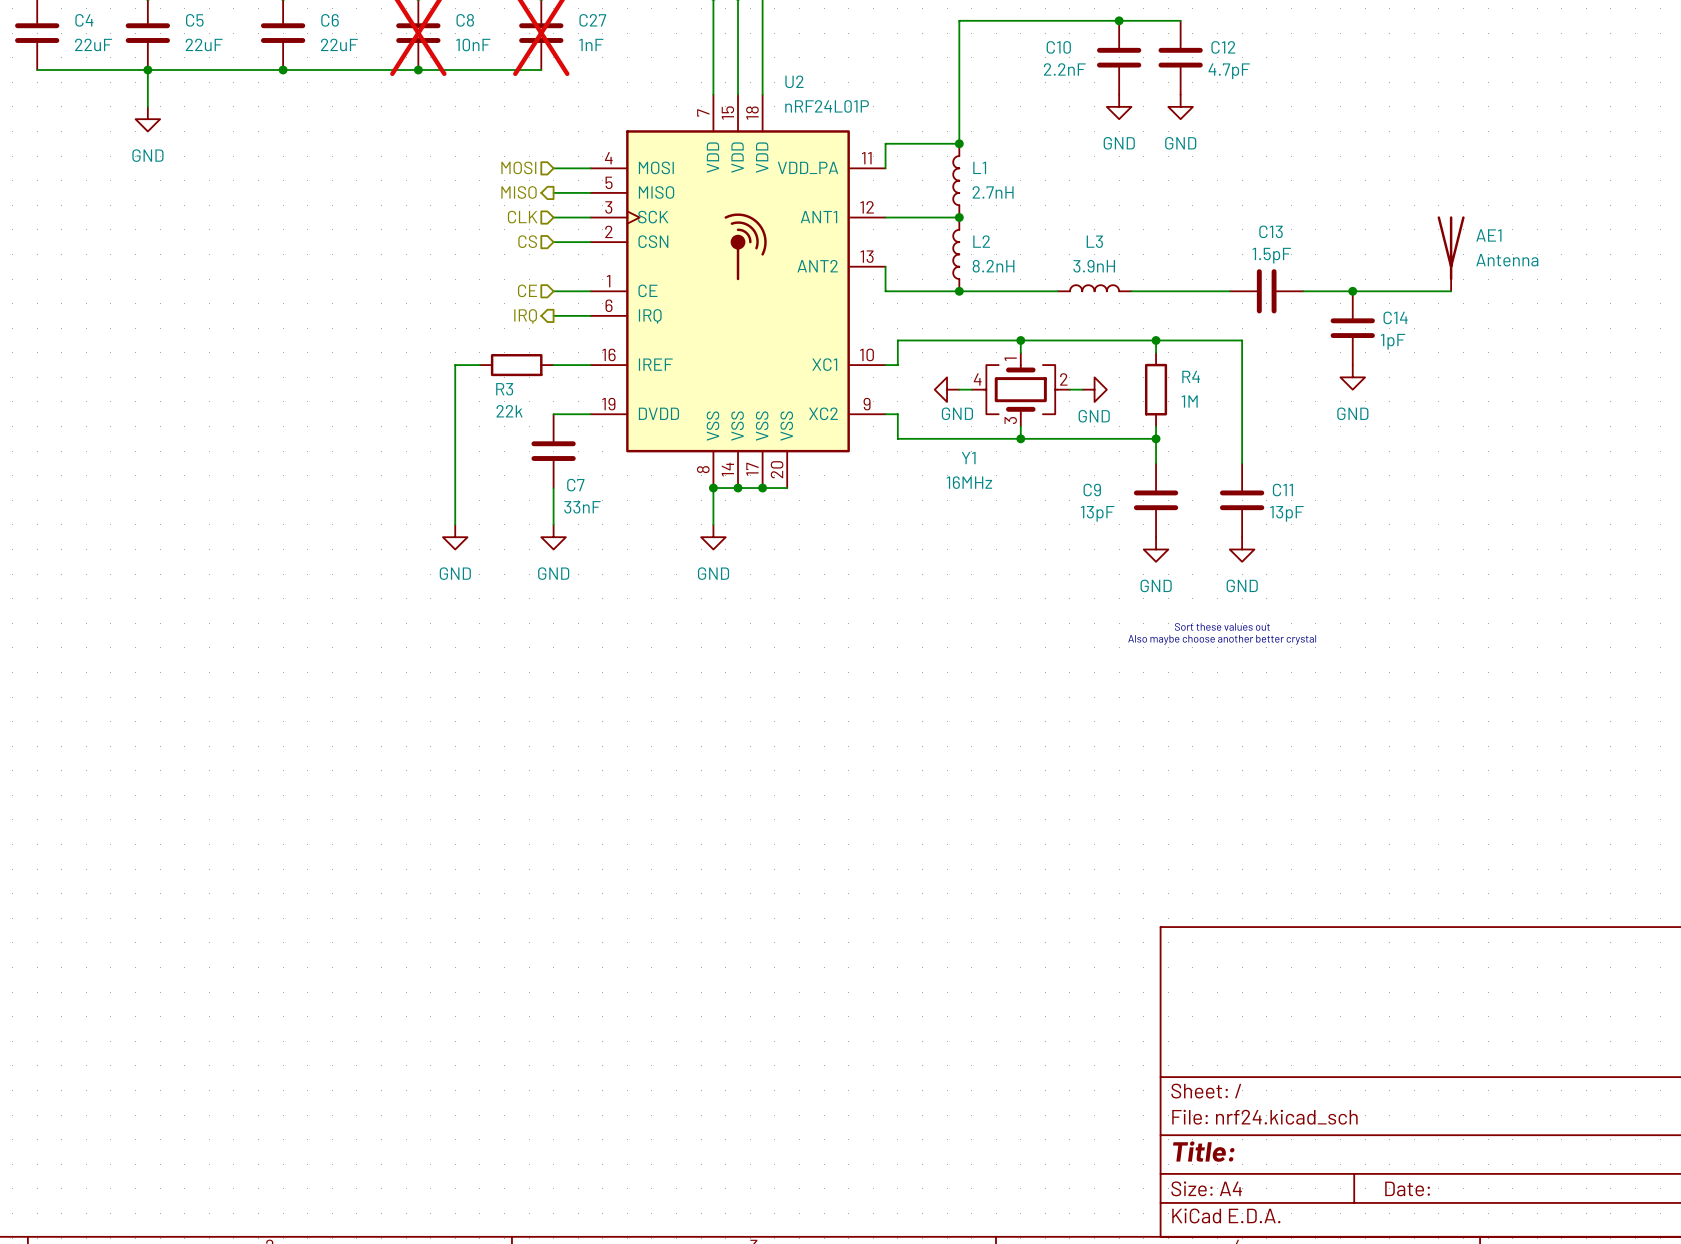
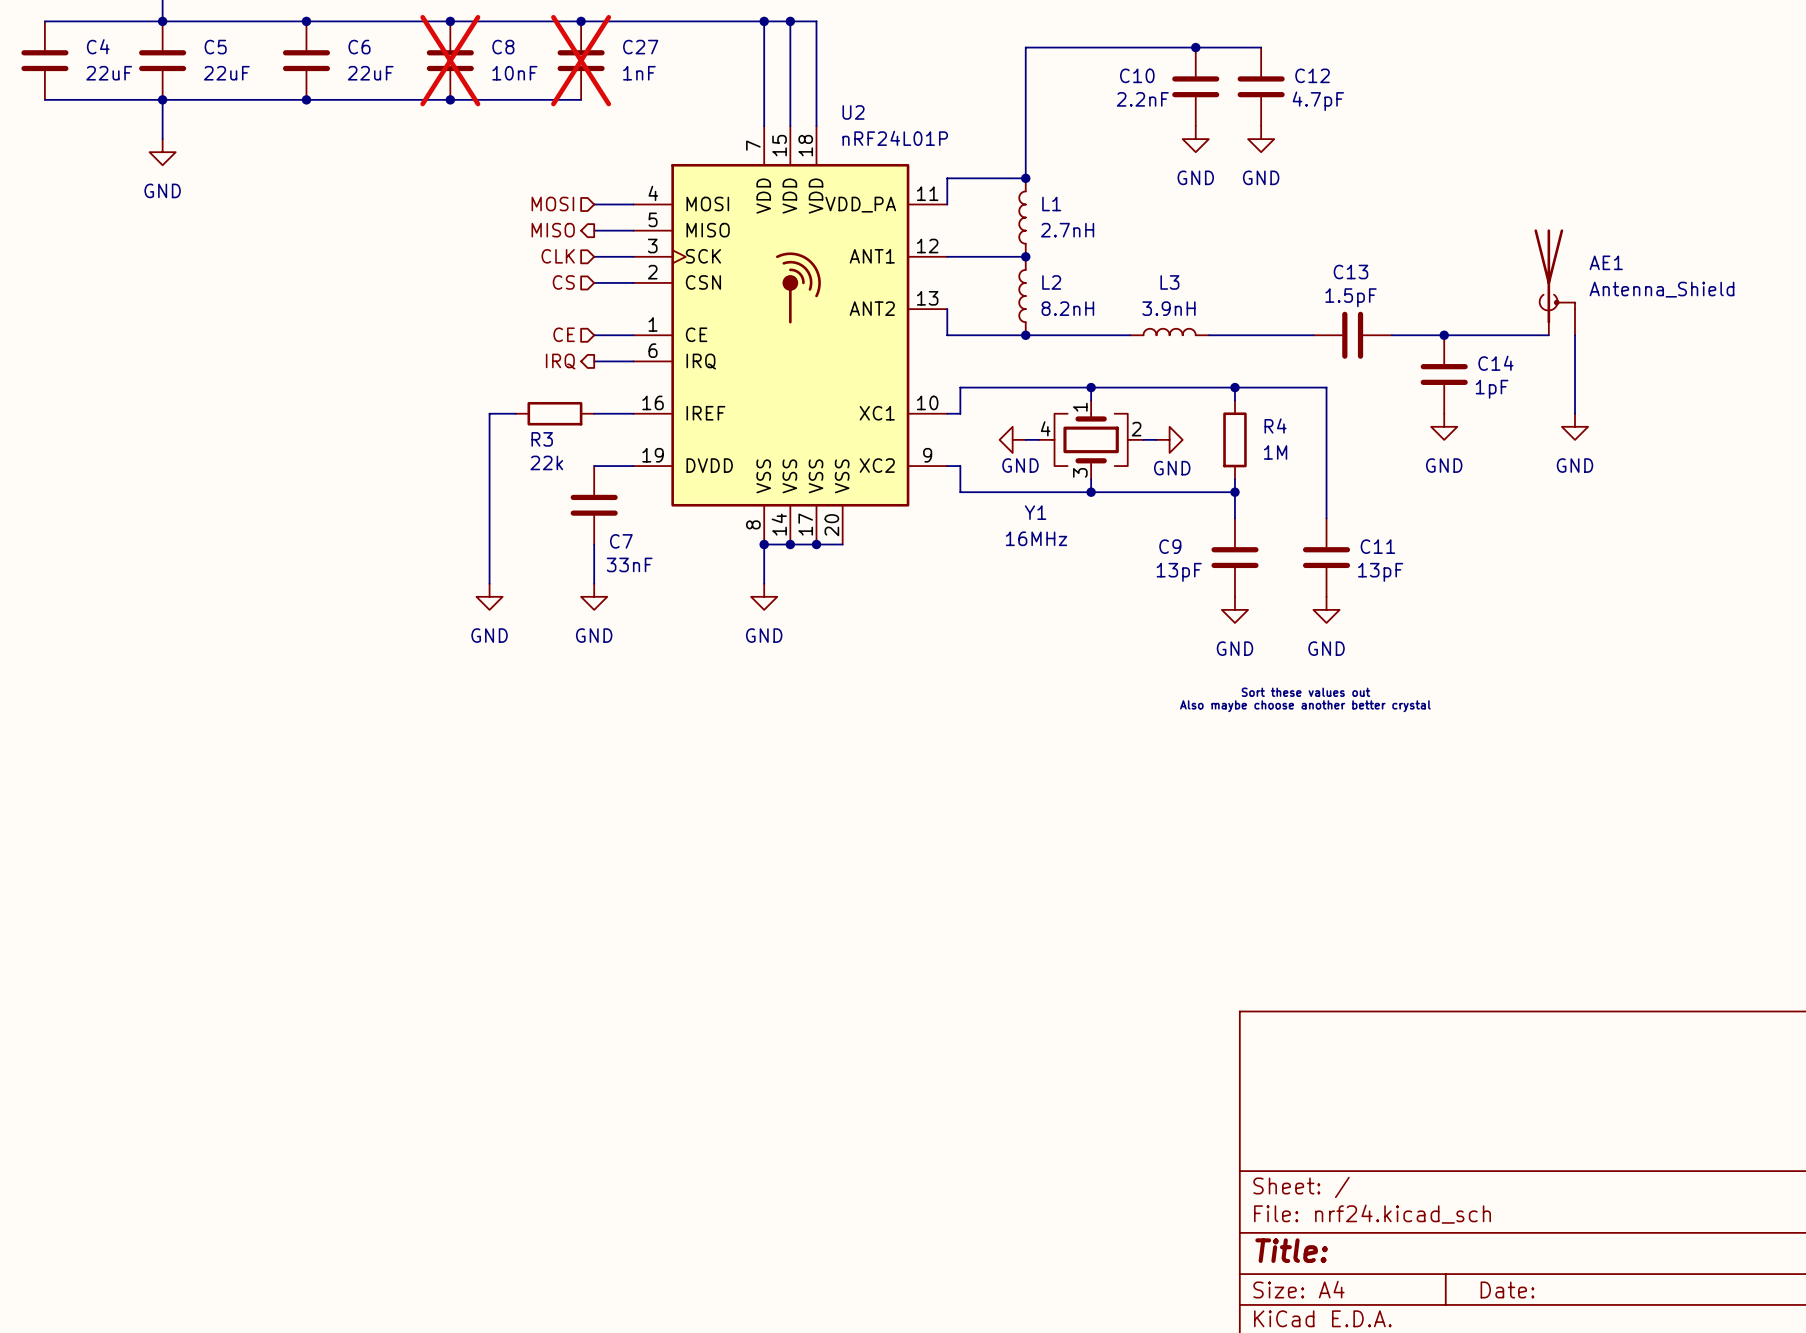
AE1 symbol: [1437, 216, 1465, 292] -> [1534, 229, 1576, 336]
AE1 value: Antenna (1507, 260) -> Antenna_Shield (1661, 289)
wire: none -> (1575, 335) (1575, 413)
power symbol: none -> GND (1575, 426)

